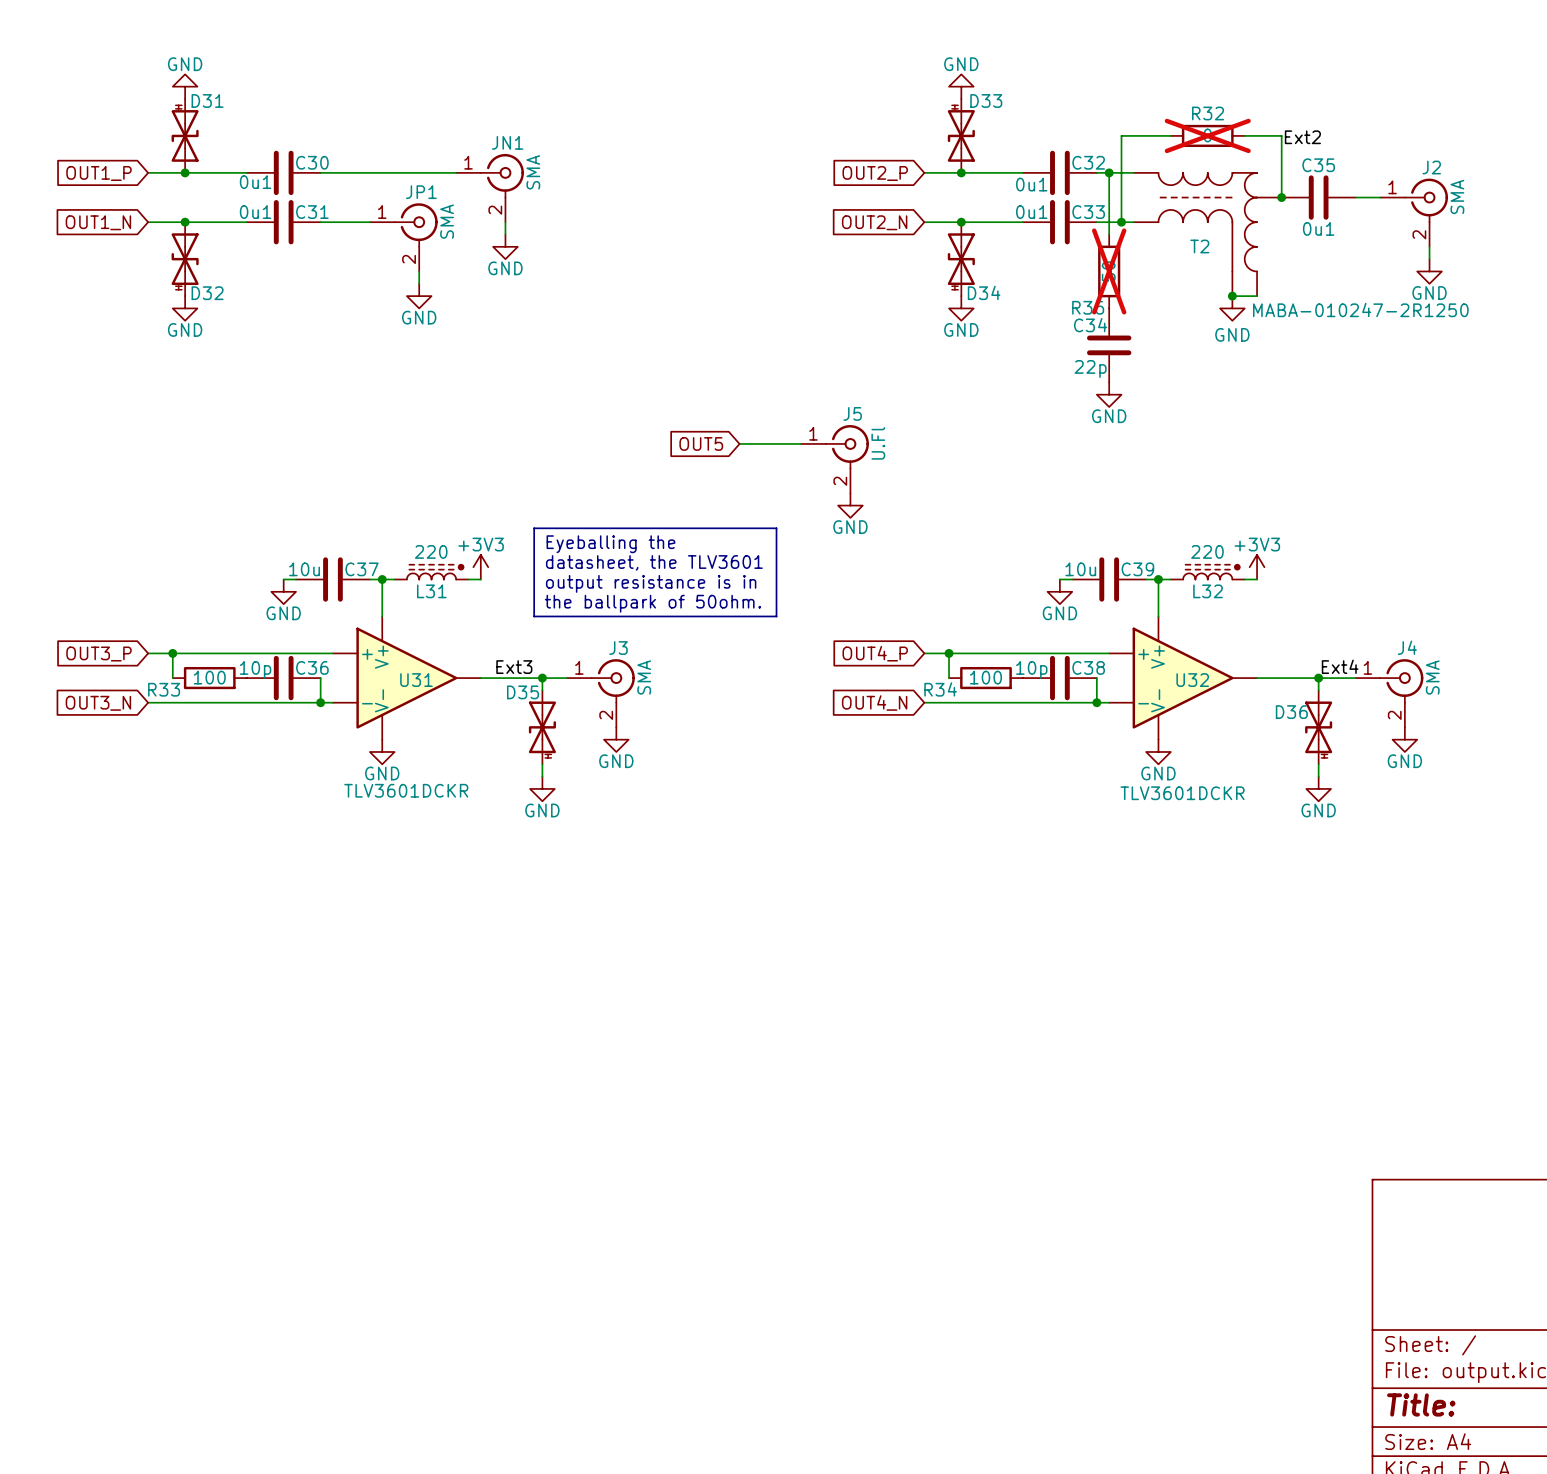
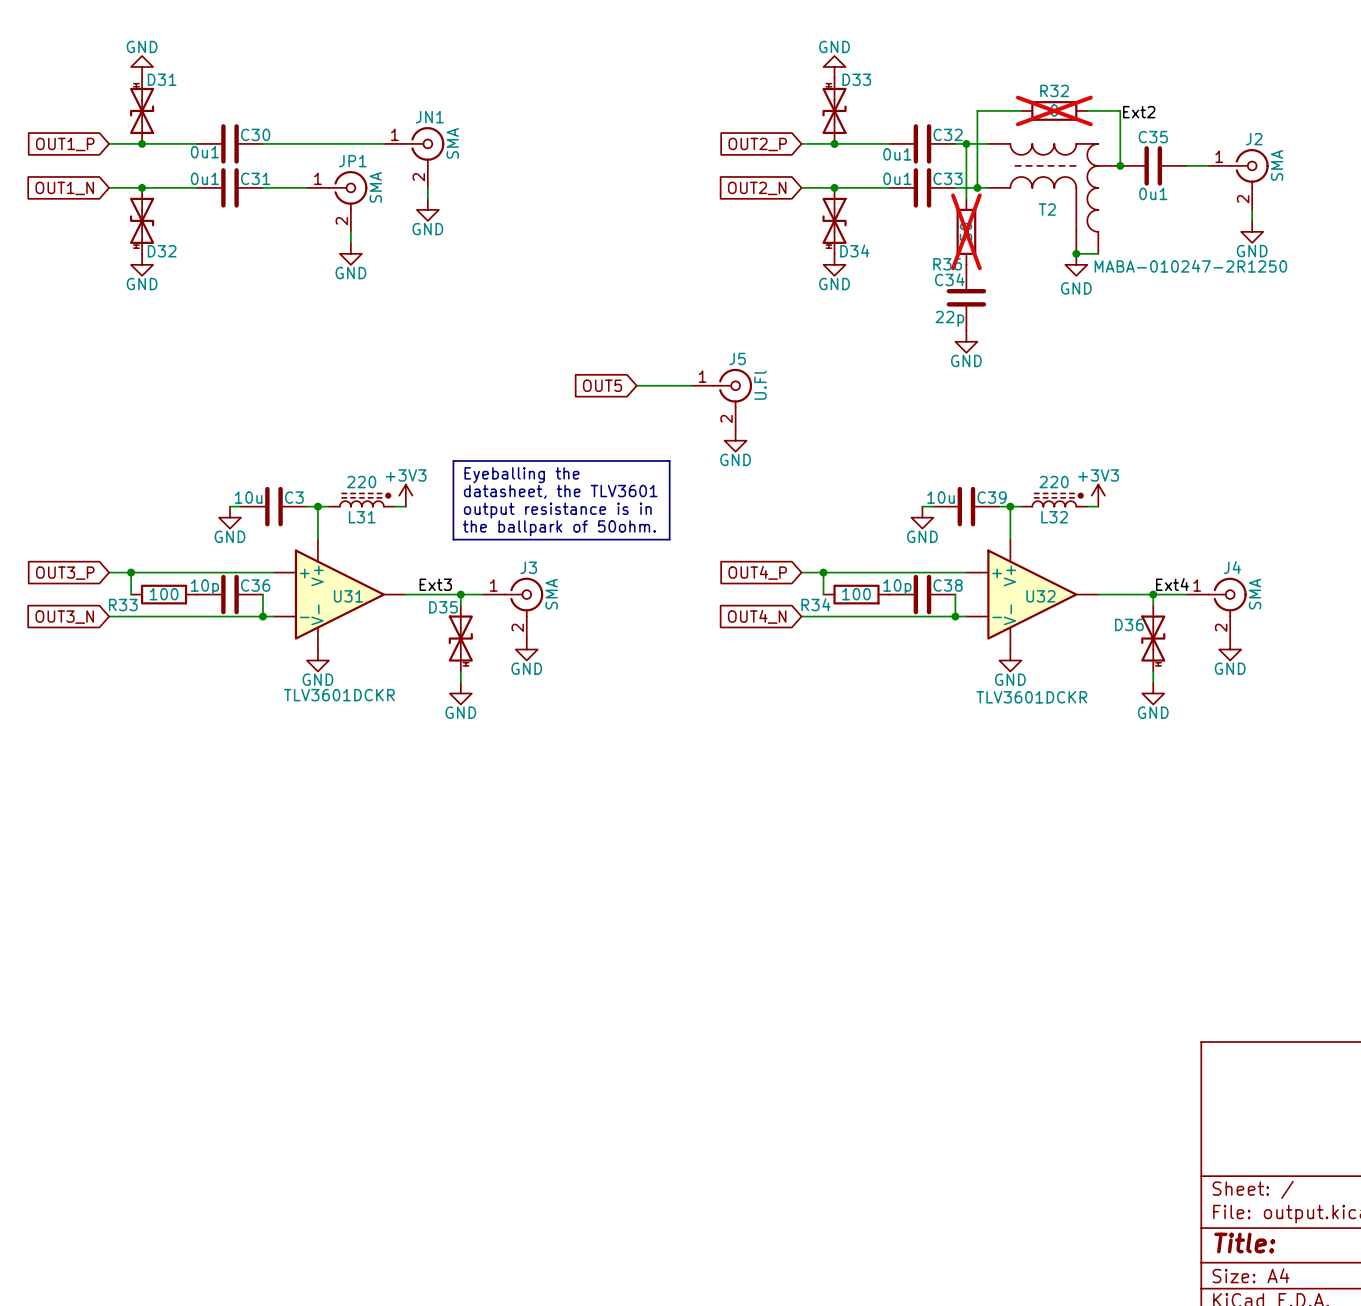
C37 name: C37 (361, 569) -> C3 (294, 497)

